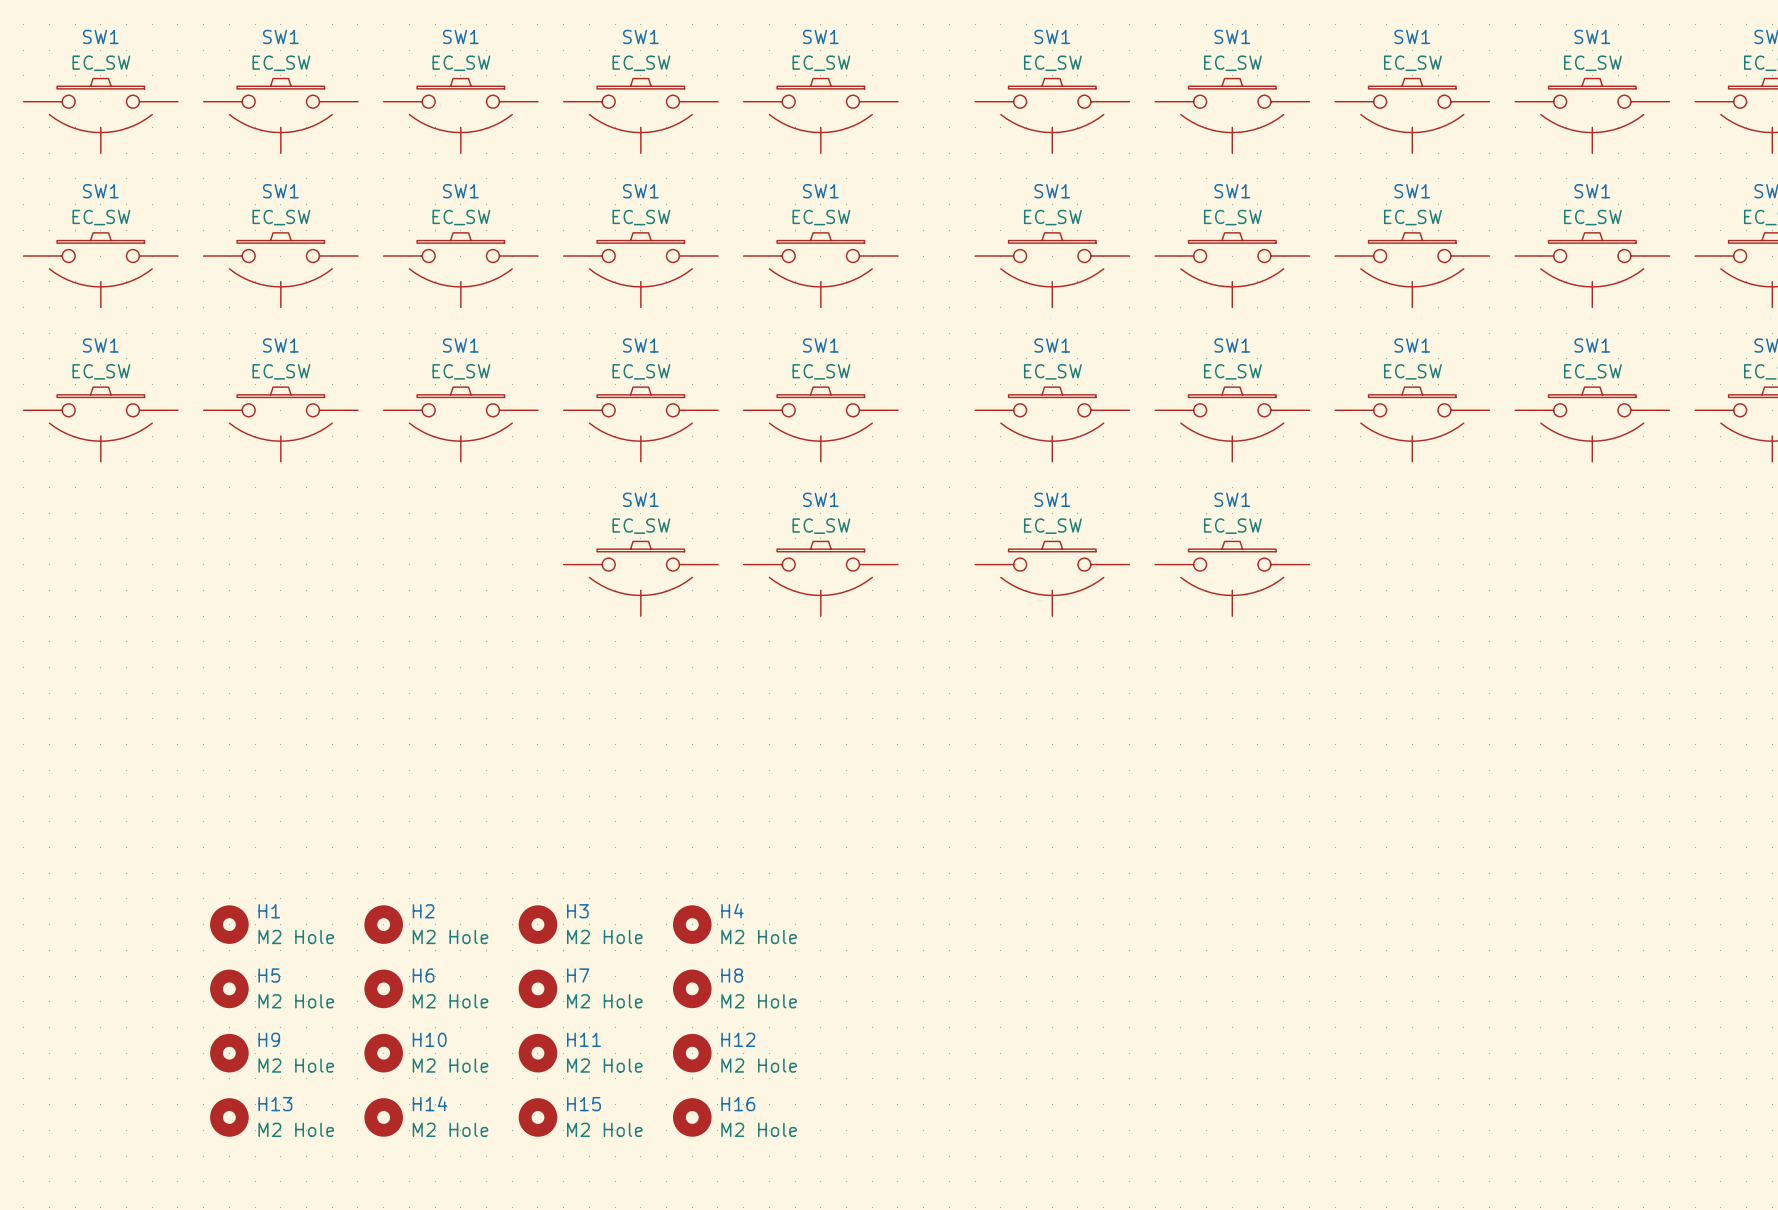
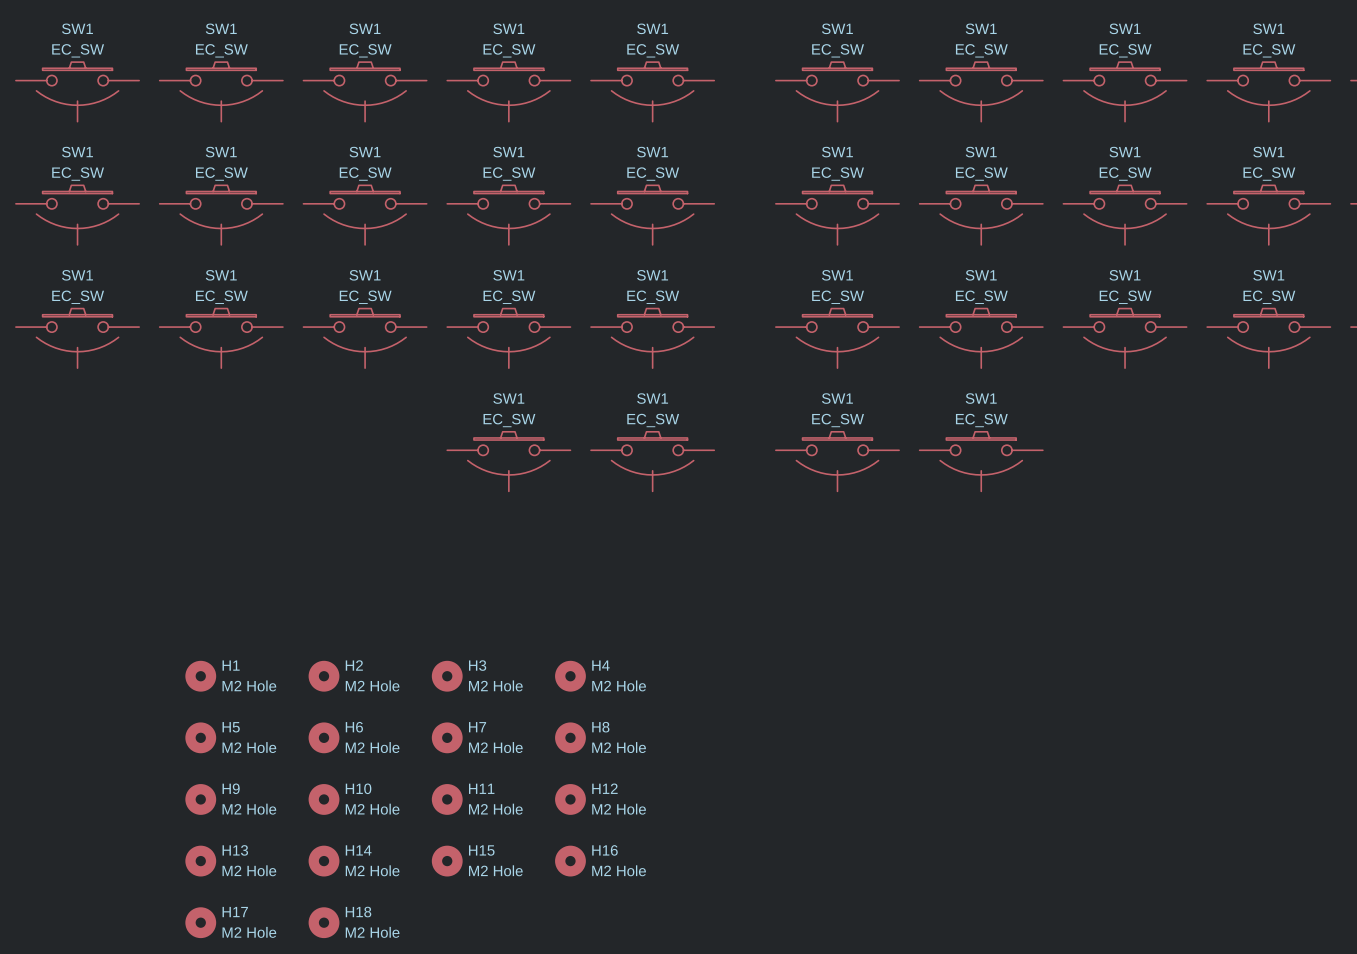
H1 position: (229, 924) -> (200, 676)
H2 position: (383, 924) -> (324, 676)
H3 position: (537, 924) -> (447, 676)
H4 position: (692, 924) -> (570, 676)
H5 position: (229, 988) -> (200, 737)
H6 position: (383, 988) -> (324, 737)
H7 position: (537, 988) -> (447, 737)
H8 position: (692, 988) -> (570, 737)
H9 position: (229, 1053) -> (200, 799)
H10 position: (383, 1053) -> (324, 799)
H11 position: (537, 1053) -> (447, 799)
H12 position: (692, 1053) -> (570, 799)
H13 position: (229, 1117) -> (200, 861)
H14 position: (383, 1117) -> (324, 861)
H15 position: (537, 1117) -> (447, 861)
H16 position: (692, 1117) -> (570, 861)
H17: none -> M2 Hole (200, 922)
H18: none -> M2 Hole (324, 922)

